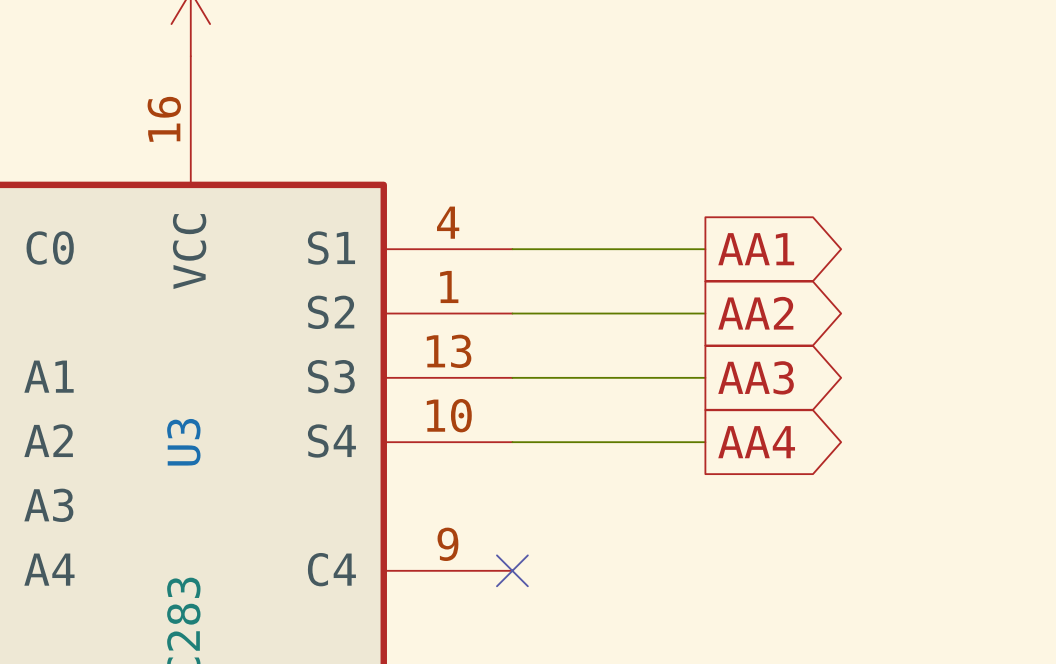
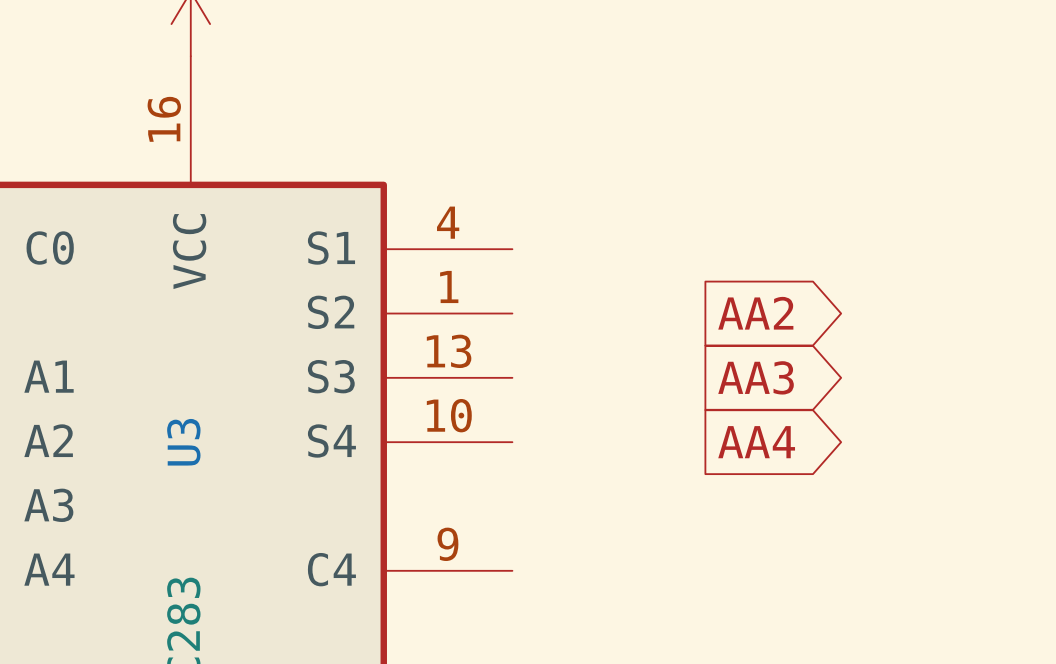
wire: (512, 249) (705, 249) -> none
global label: AA1 (756, 249) -> none
wire: (512, 313) (705, 313) -> none
wire: (512, 377) (705, 377) -> none
wire: (512, 442) (705, 442) -> none
no-connect mark: (512, 570) -> none

